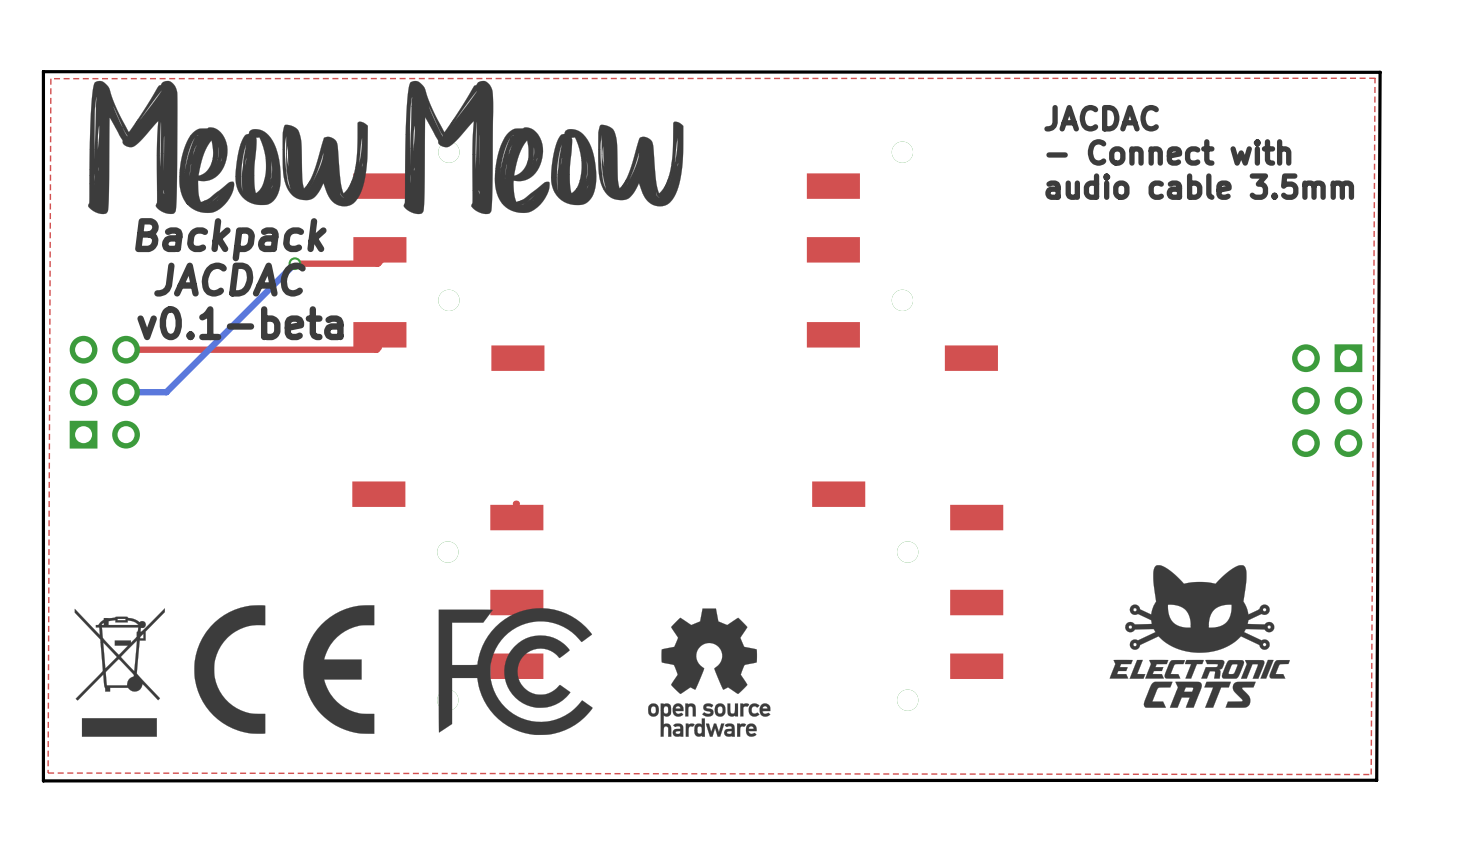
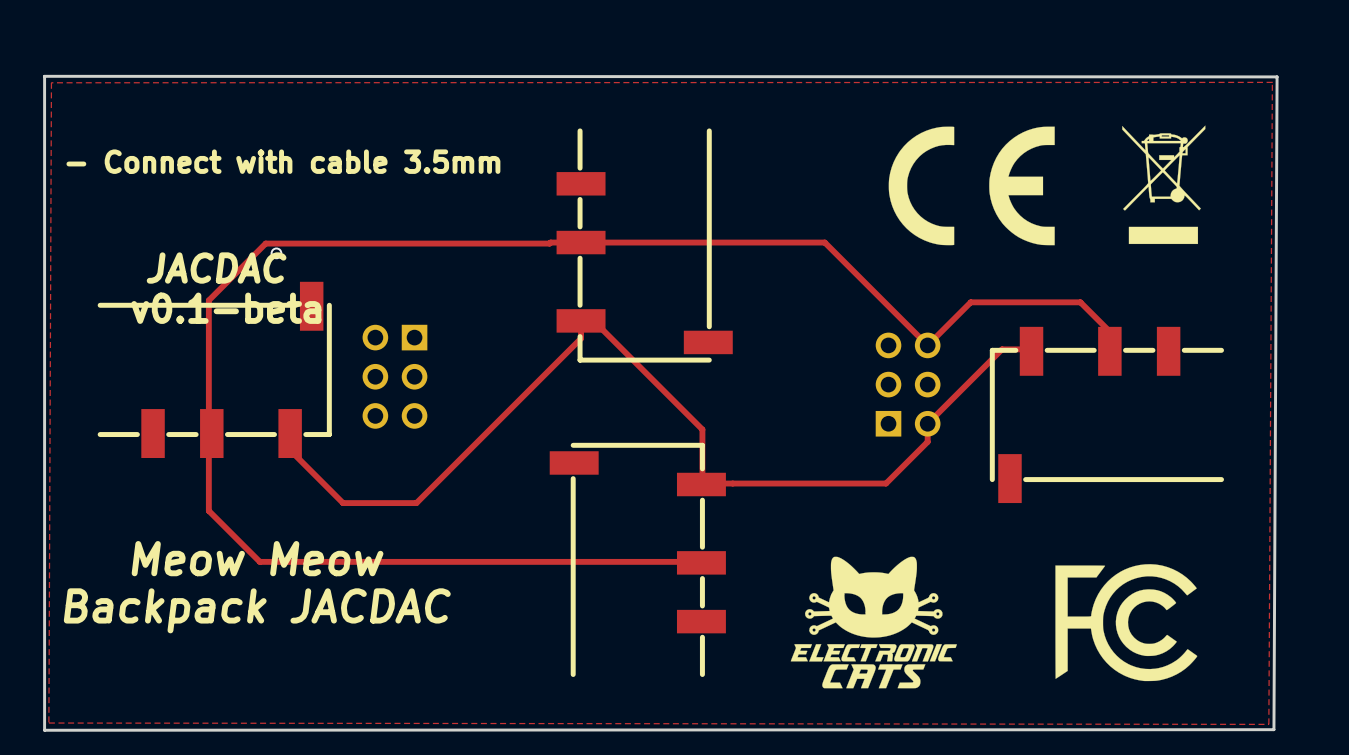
drawing: [88, 80, 684, 215] -> none
text: JACDAC (1101, 118) -> none
drawing: none -> [1122, 125, 1206, 245]
drawing: none -> [888, 126, 1055, 246]
text: - Connect with (1168, 152) -> none
text: none -> - Connect with cable 3.5mm (283, 161)
text: audio cable 3.5mm (1199, 186) -> none
text: Backpack (230, 239) -> none
top track: (389, 251) (377, 263) (294, 263) -> none
part: none -> (644, 245)
part: (448, 256) -> none
part: (902, 256) -> none
bottom track: (294, 263) (166, 392) (126, 392) -> none
top track: (378, 347) (376, 349) (126, 349) -> none
top track: none -> (1036, 349) (1002, 349) (927, 423) (927, 441) (886, 483) (702, 483) (702, 429) (593, 320) (581, 320) (581, 338) (416, 503) (343, 503) (287, 447) (287, 434)
top track: none -> (1114, 349) (1114, 336) (1080, 302) (970, 302) (927, 345) (824, 242) (265, 243) (208, 300) (208, 510) (259, 561) (702, 561)
part: none -> (214, 369)
part rotation: 0° (104, 392) -> 180° (394, 376)
part position: (104, 392) -> (394, 376)
part rotation: 0° (1327, 400) -> 180° (908, 384)
part position: (1327, 400) -> (908, 384)
part: none -> (1106, 414)
top track: (516, 503) (515, 503) -> none
text: none -> Meow Meow (257, 558)
part: (447, 596) -> none
part: none -> (637, 559)
part: (907, 596) -> none
drawing: none -> [1055, 564, 1198, 682]
drawing: [194, 605, 375, 734] -> none
drawing: [74, 608, 165, 737] -> none
drawing: [438, 608, 593, 736] -> none
drawing: [648, 608, 771, 737] -> none
drawing position: (1199, 636) -> (873, 622)
text: none -> Backpack JACDAC (257, 610)

